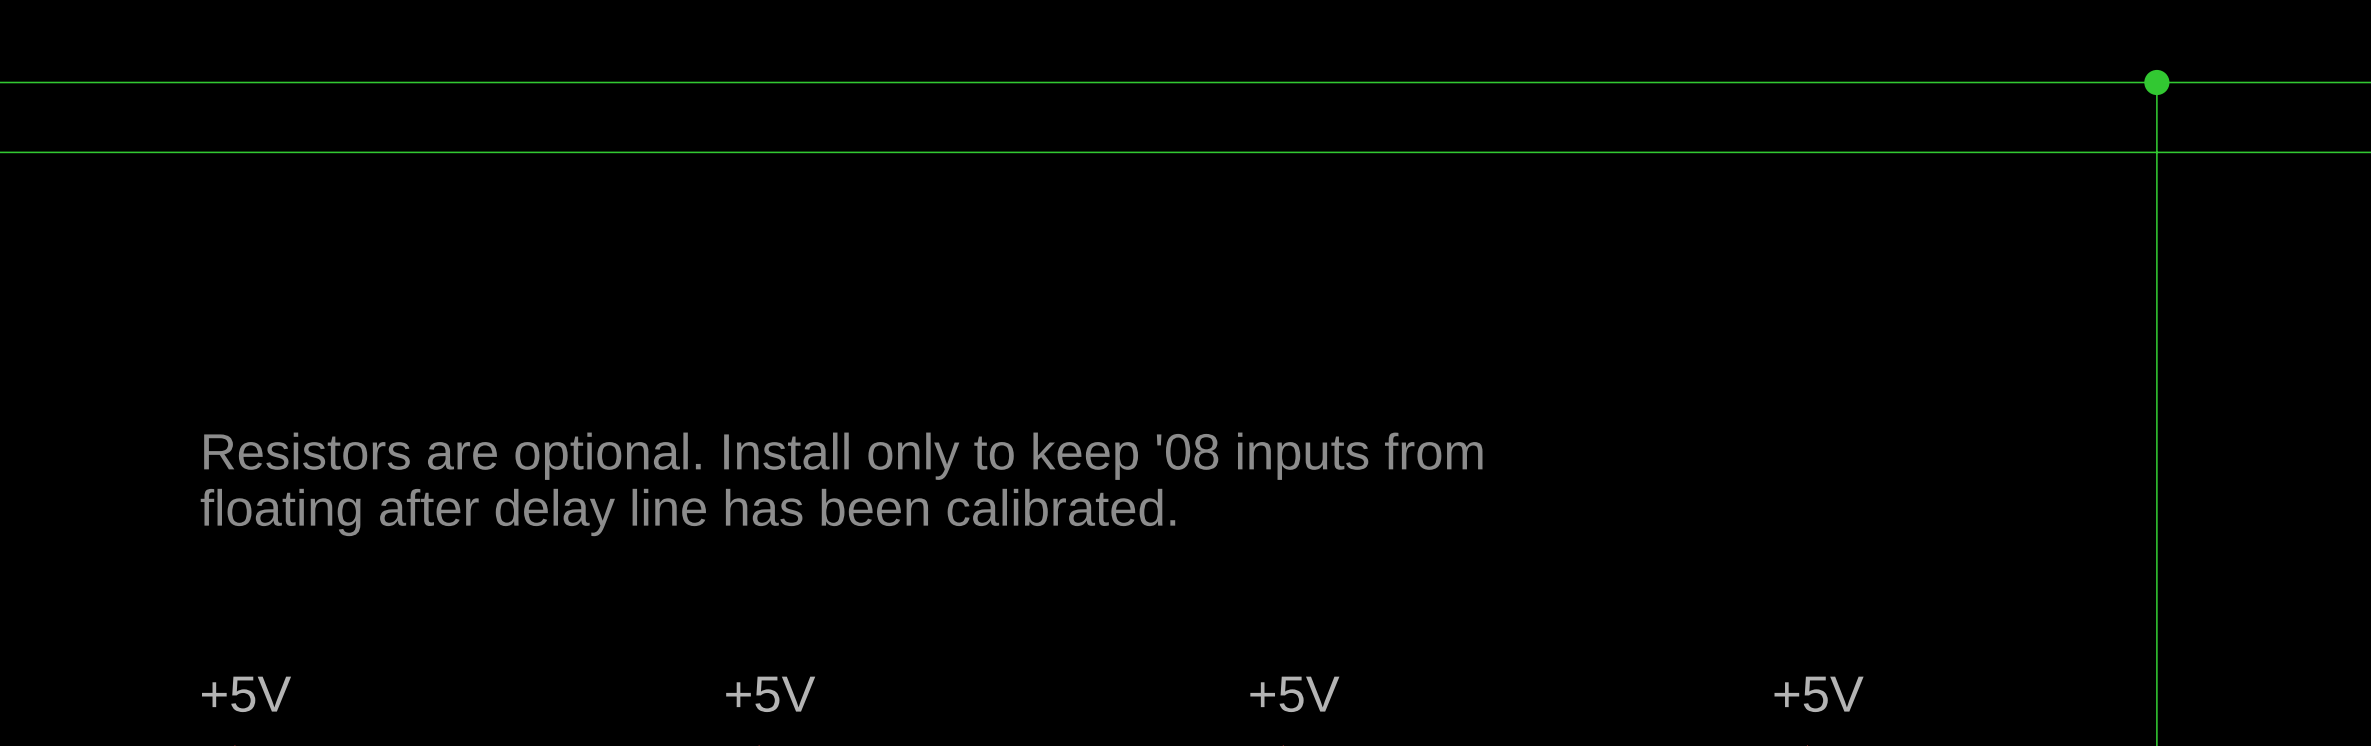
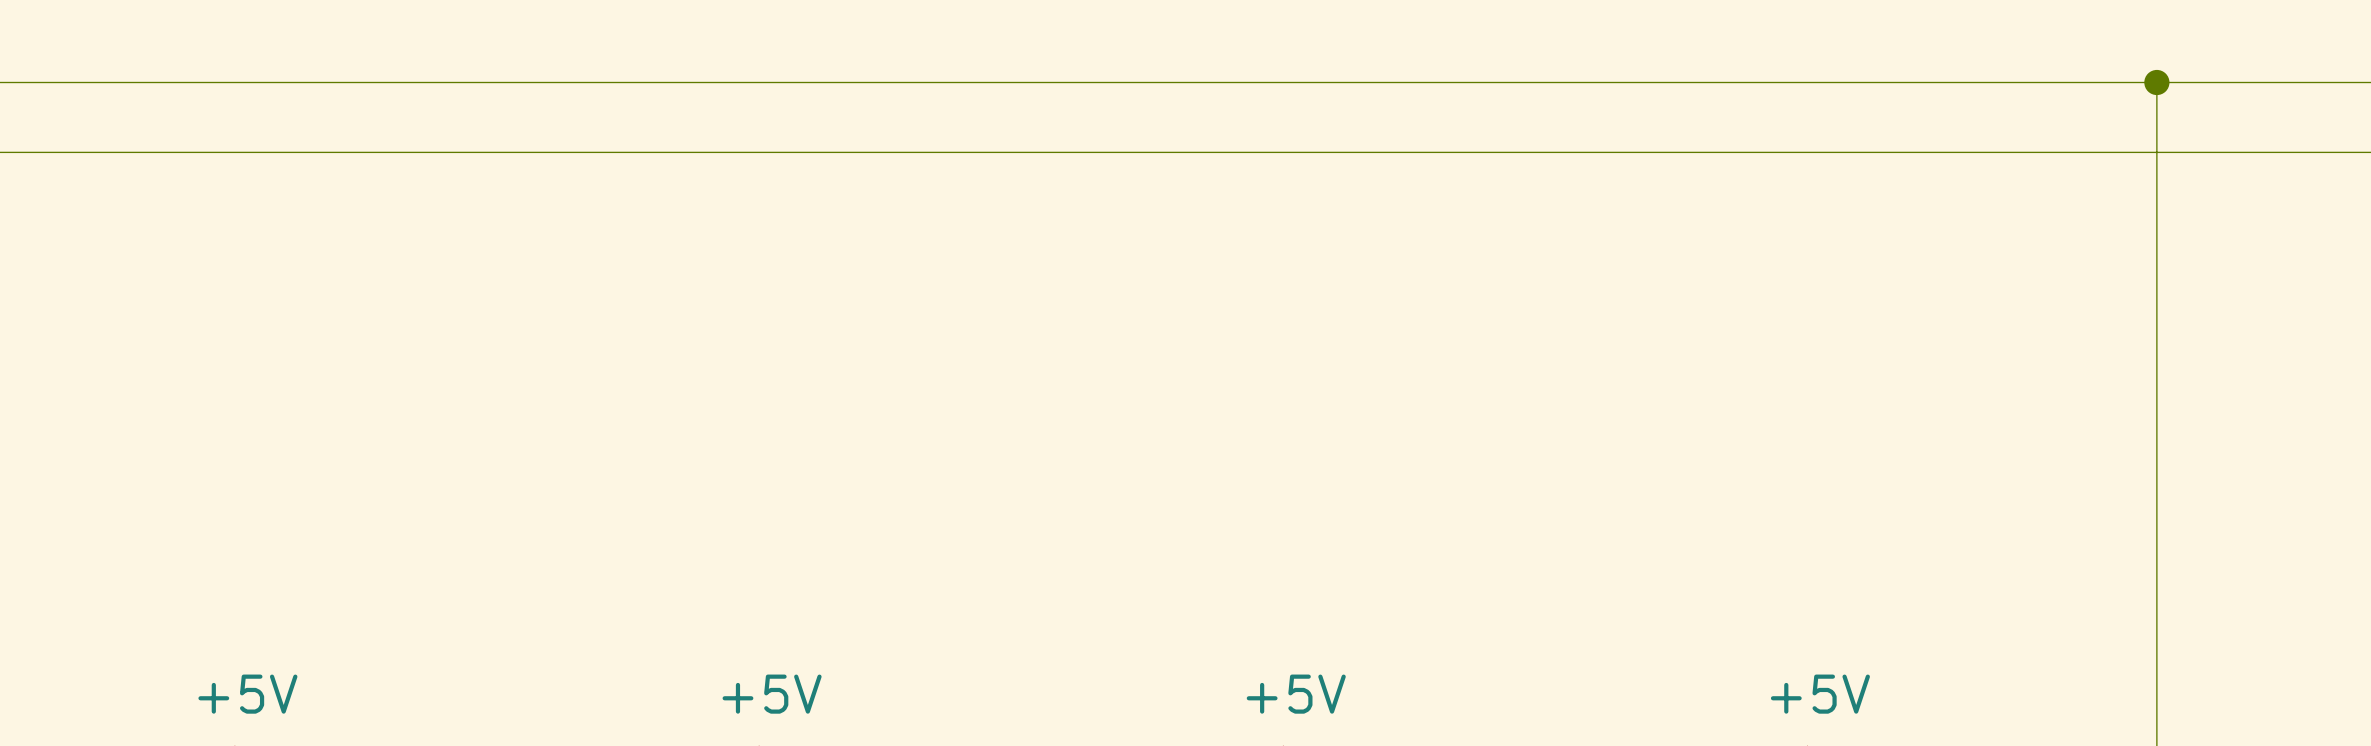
text: Resistors are optional. Install only to keep '08 inputs from (843, 456) -> none
text: floating after delay line has been calibrated. (687, 512) -> none

